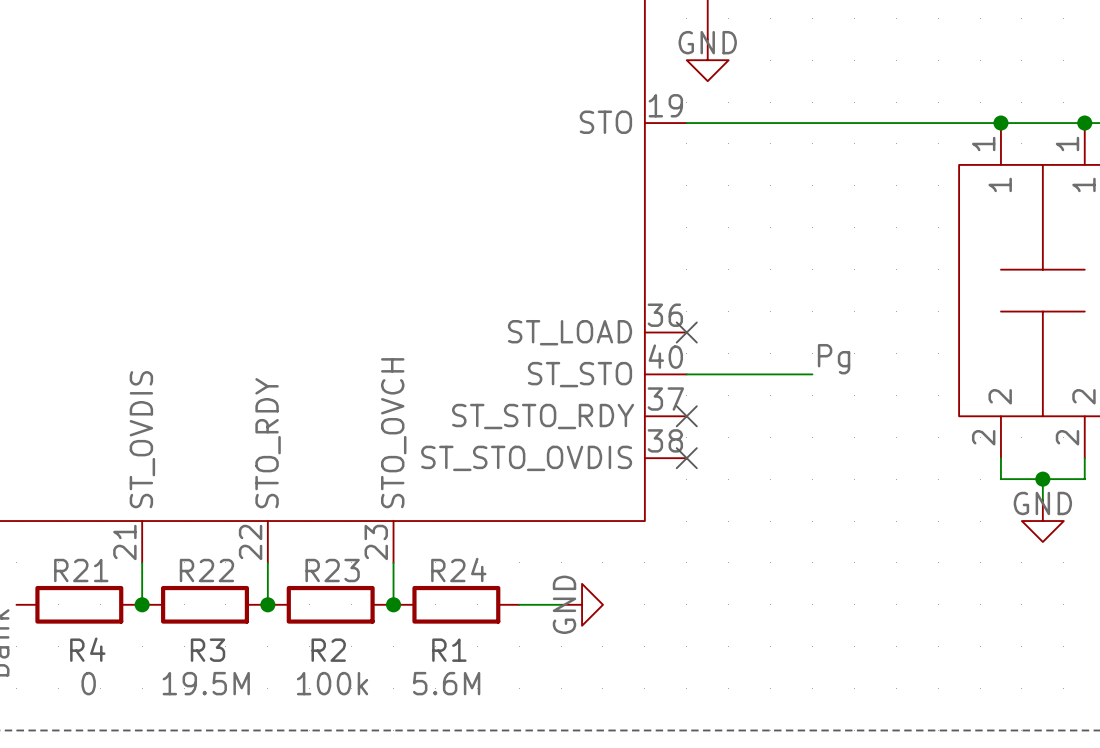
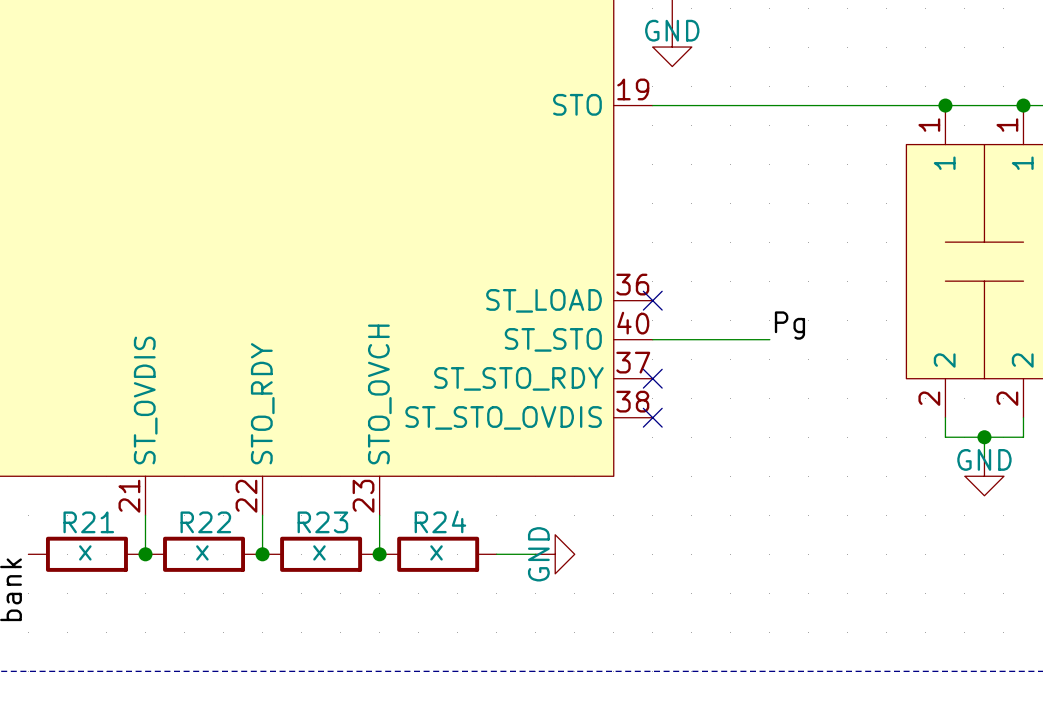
text: R4 R3 R2 R1 (268, 649) -> none
R21 value: 0 (88, 683) -> x (85, 552)
R22 value: 19.5M (206, 683) -> x (202, 552)
R23 value: 100k (332, 683) -> x (319, 552)
R24 value: 5.6M (446, 683) -> x (436, 552)

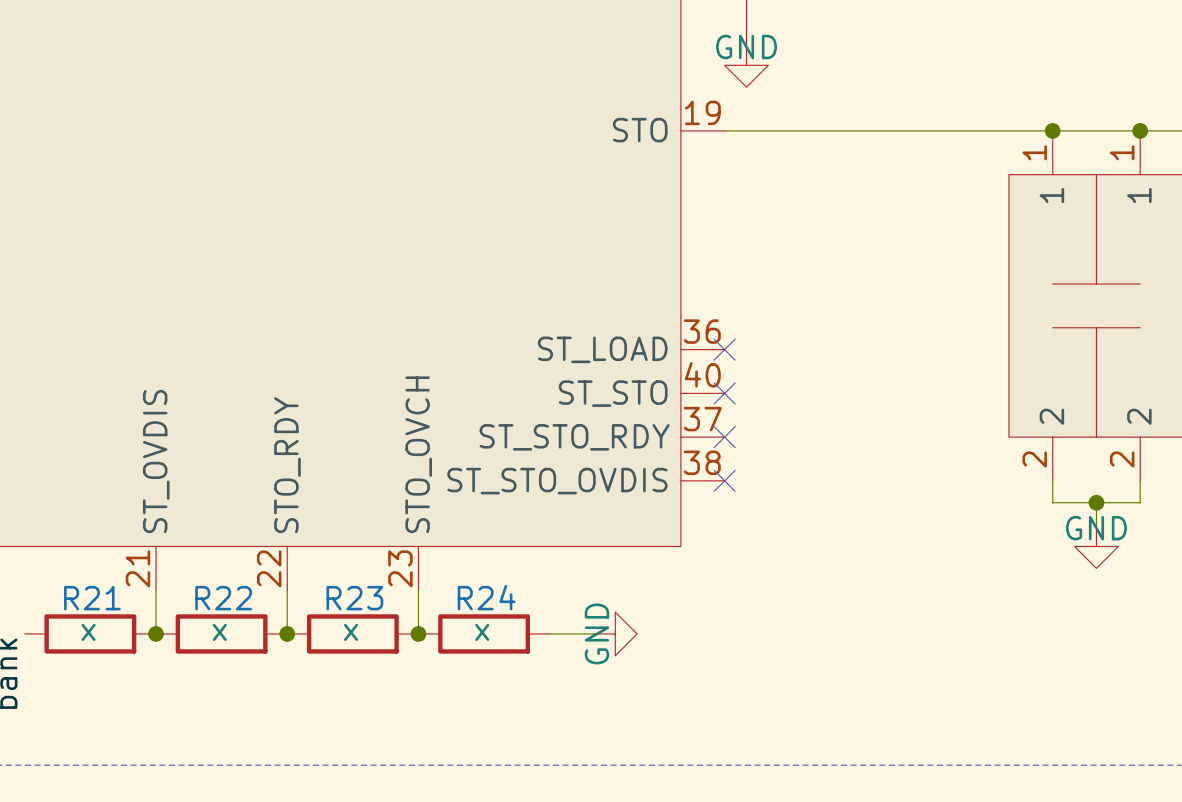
label: Pg (789, 325) -> none
wire: (652, 339) (769, 339) -> none
no-connect mark: none -> (724, 393)

